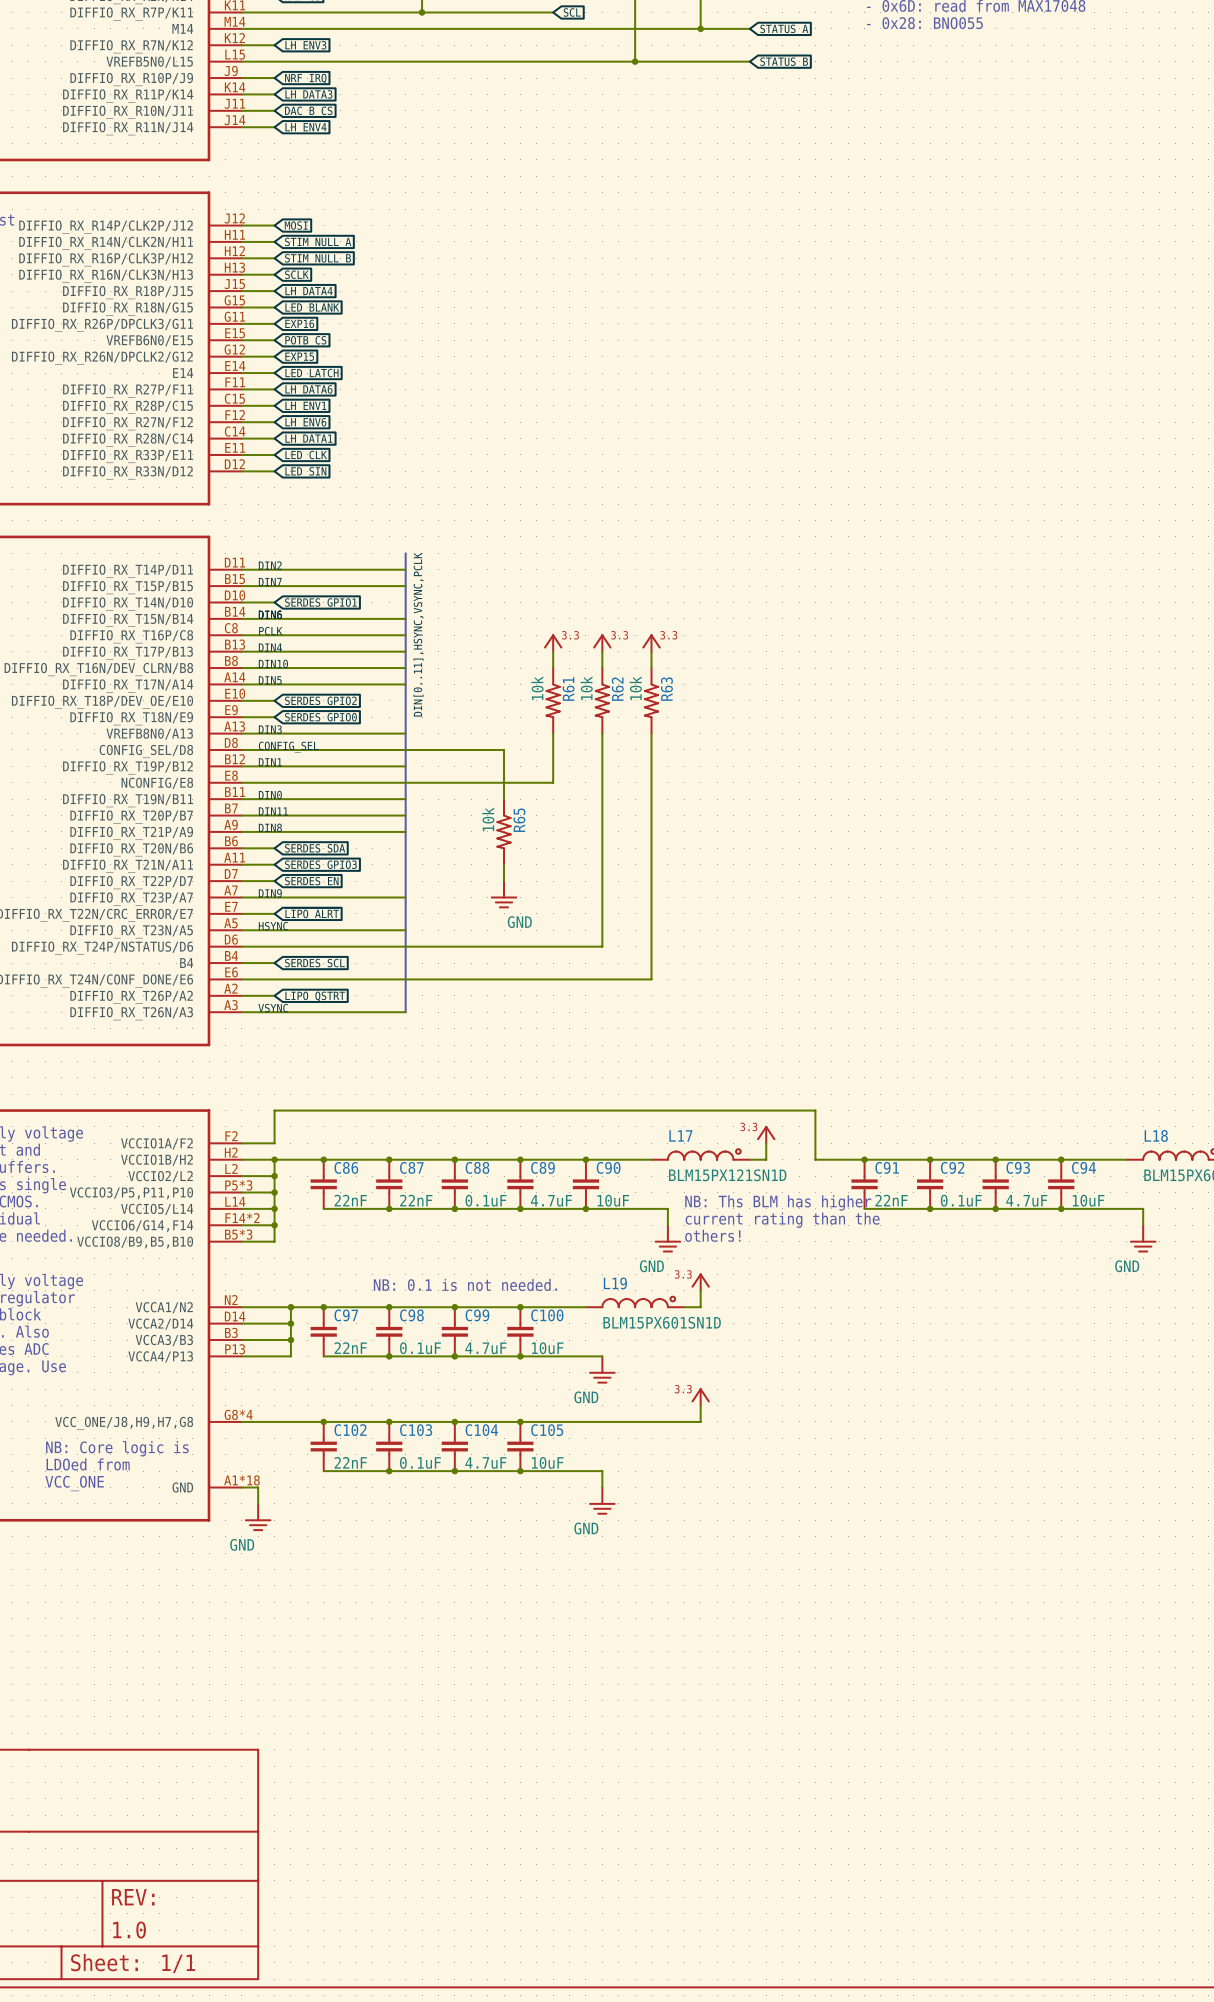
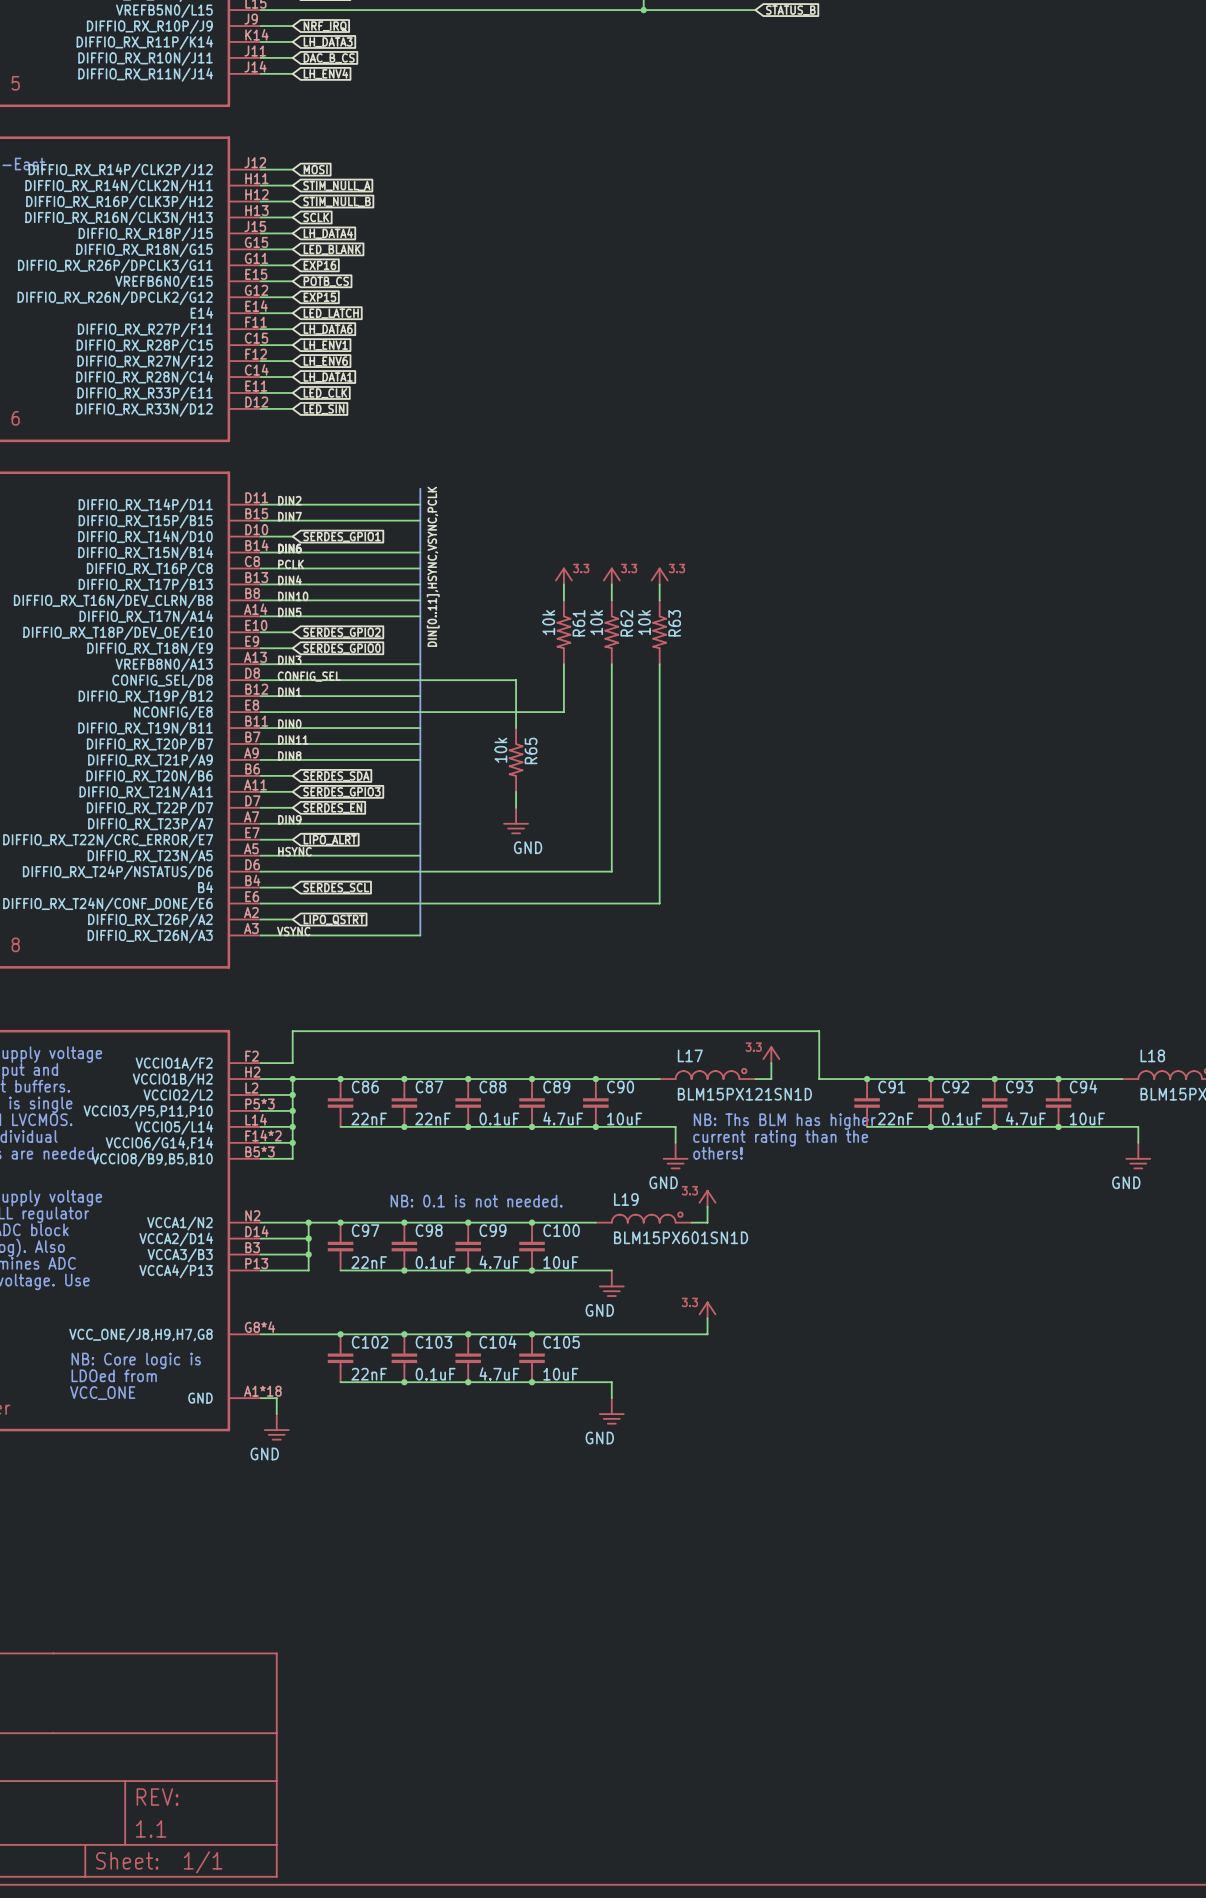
part text: 1.0 (129, 1930) -> 1.1 (151, 1828)

